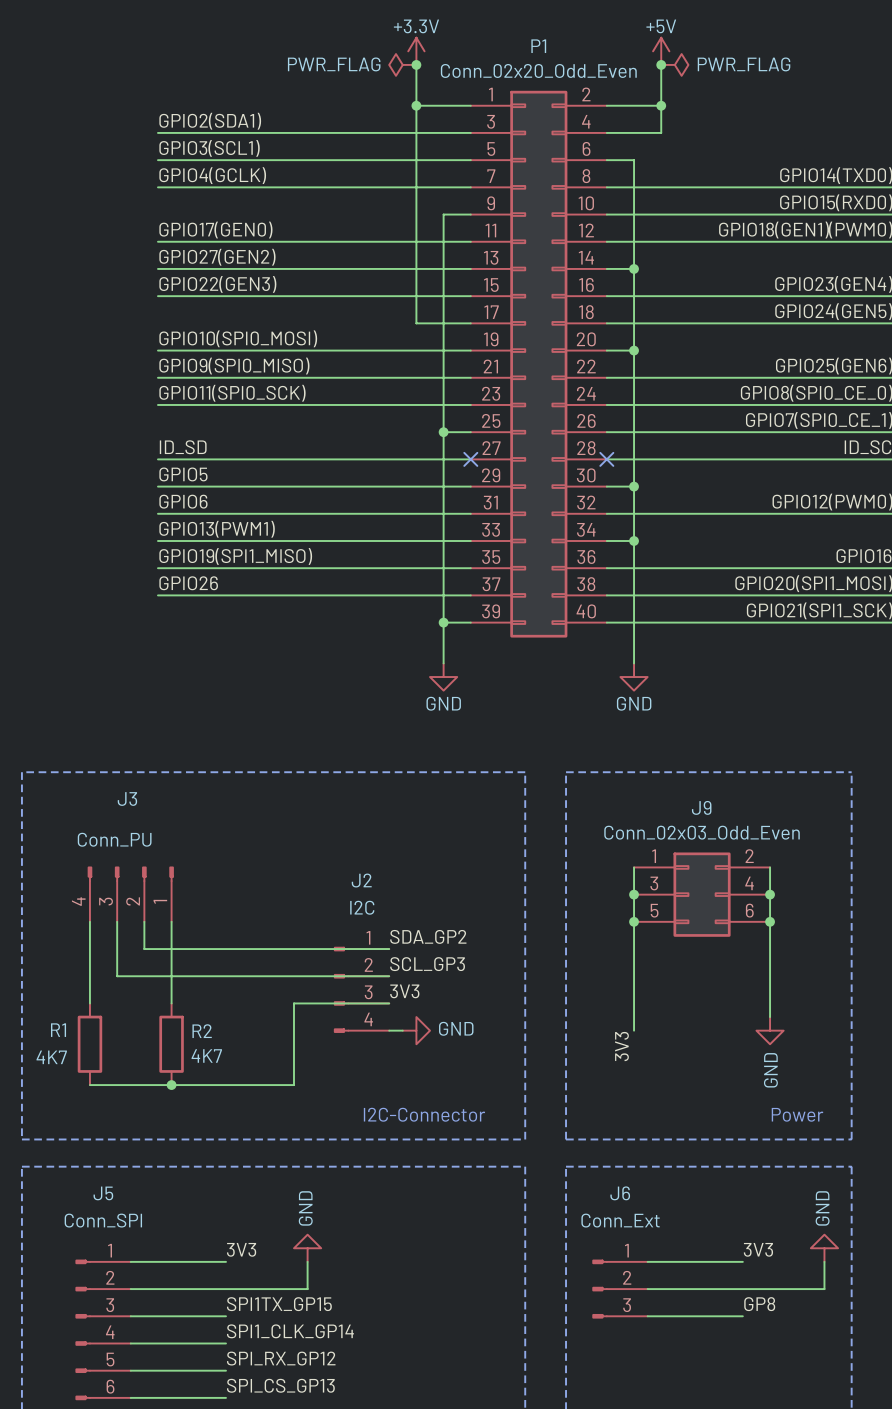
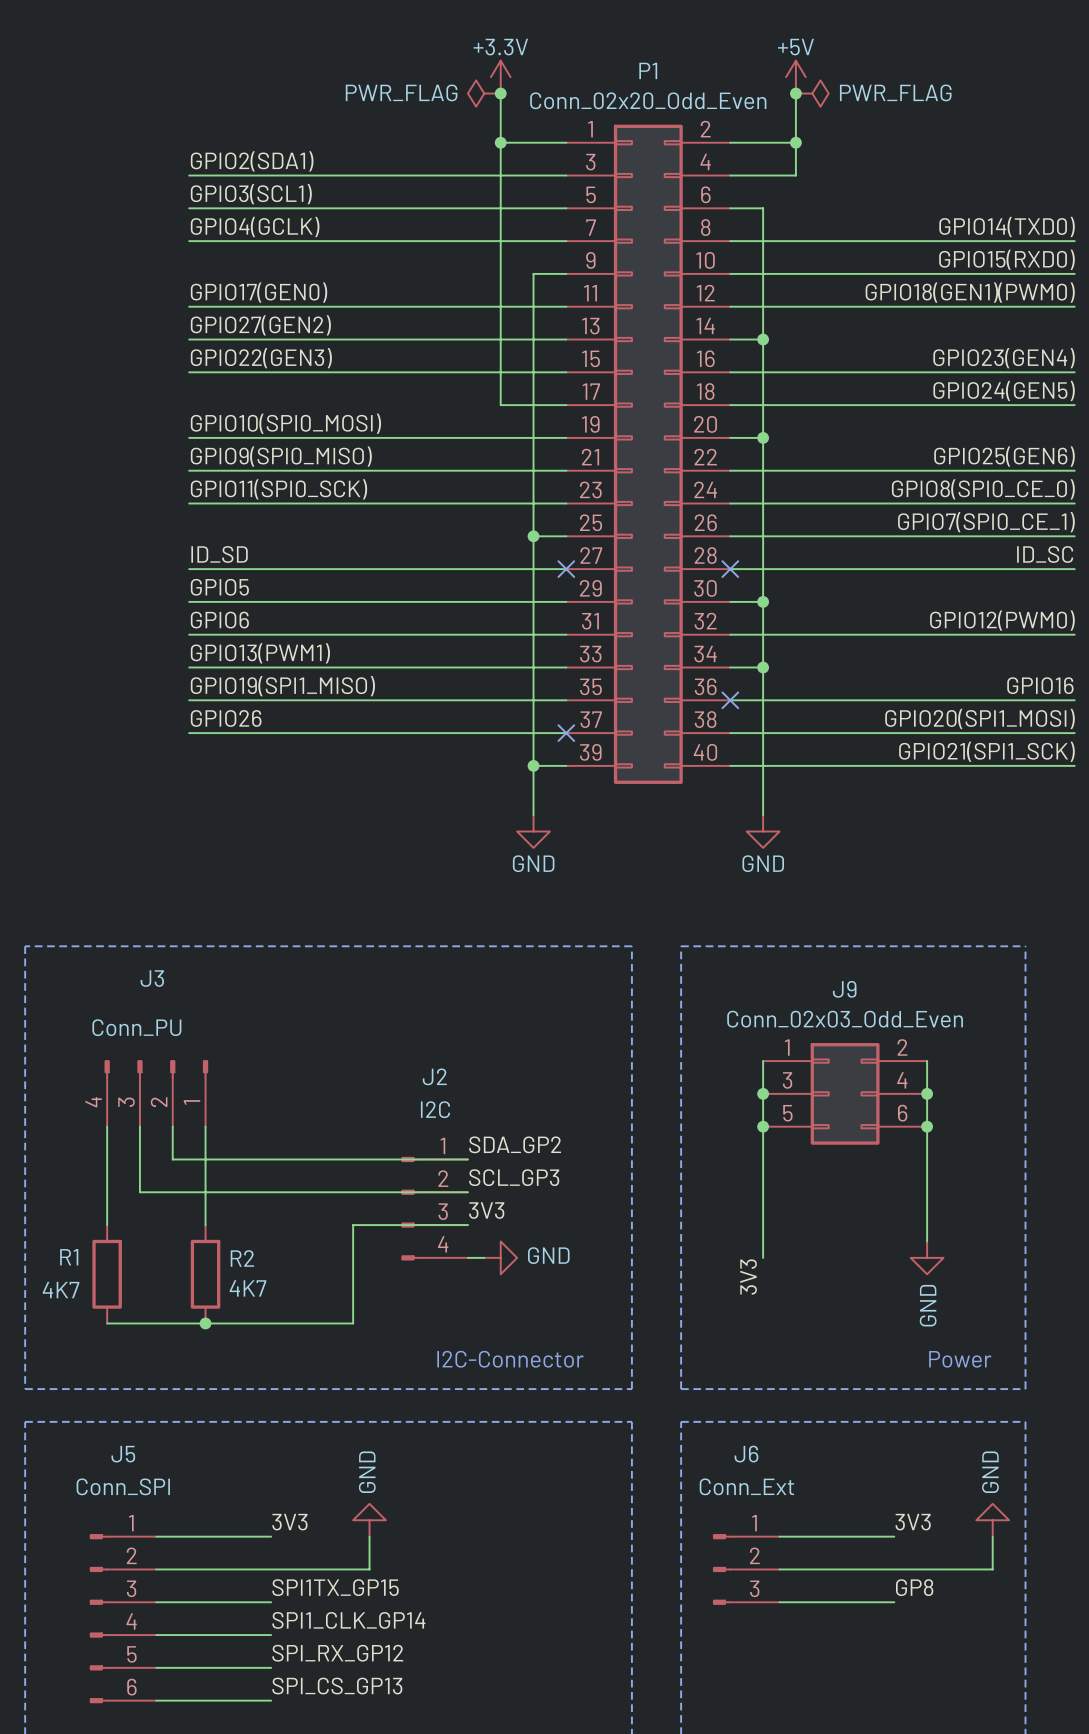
no-connect mark: none -> (730, 700)
no-connect mark: none -> (566, 733)

